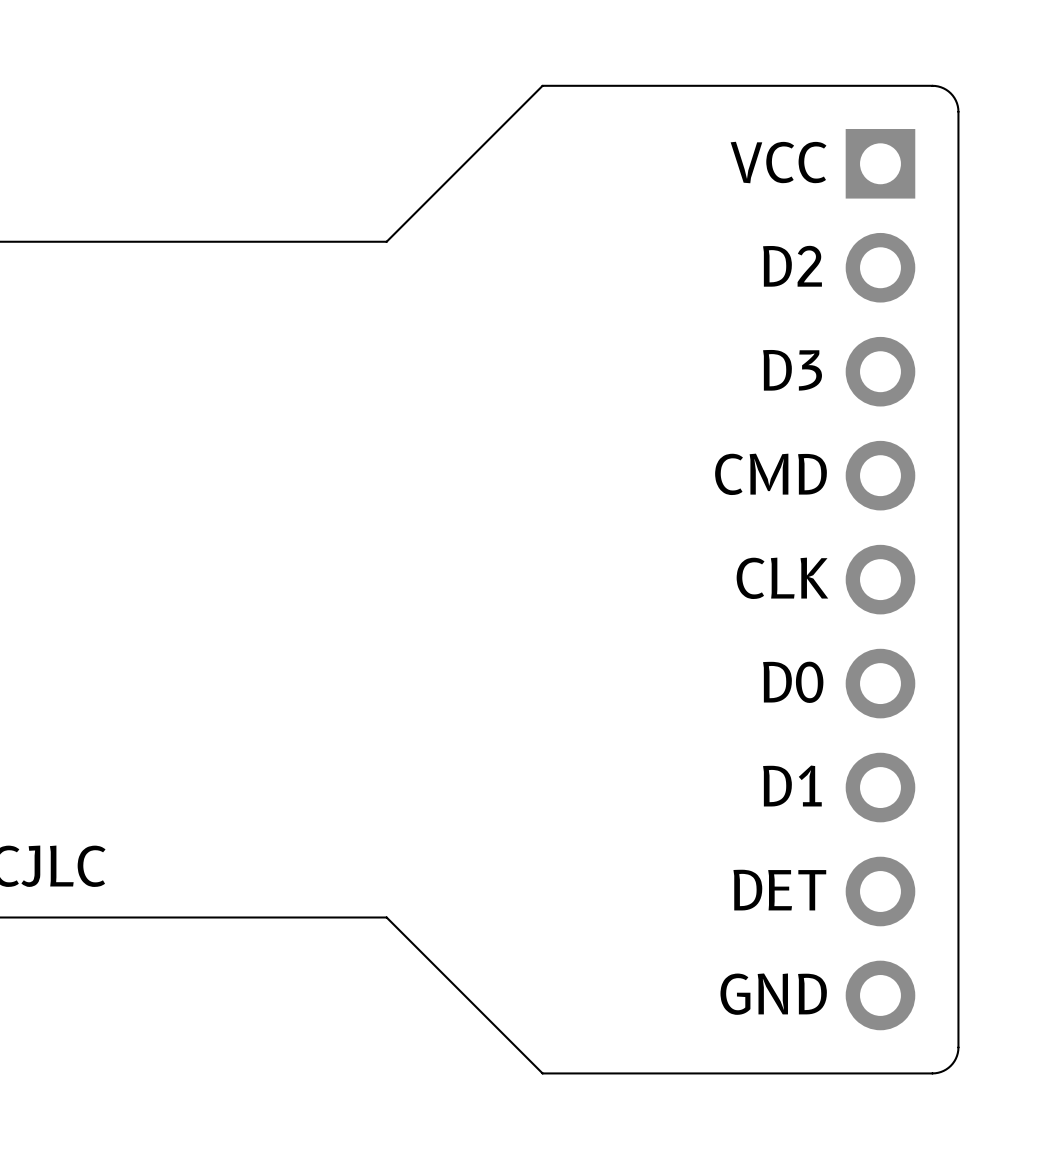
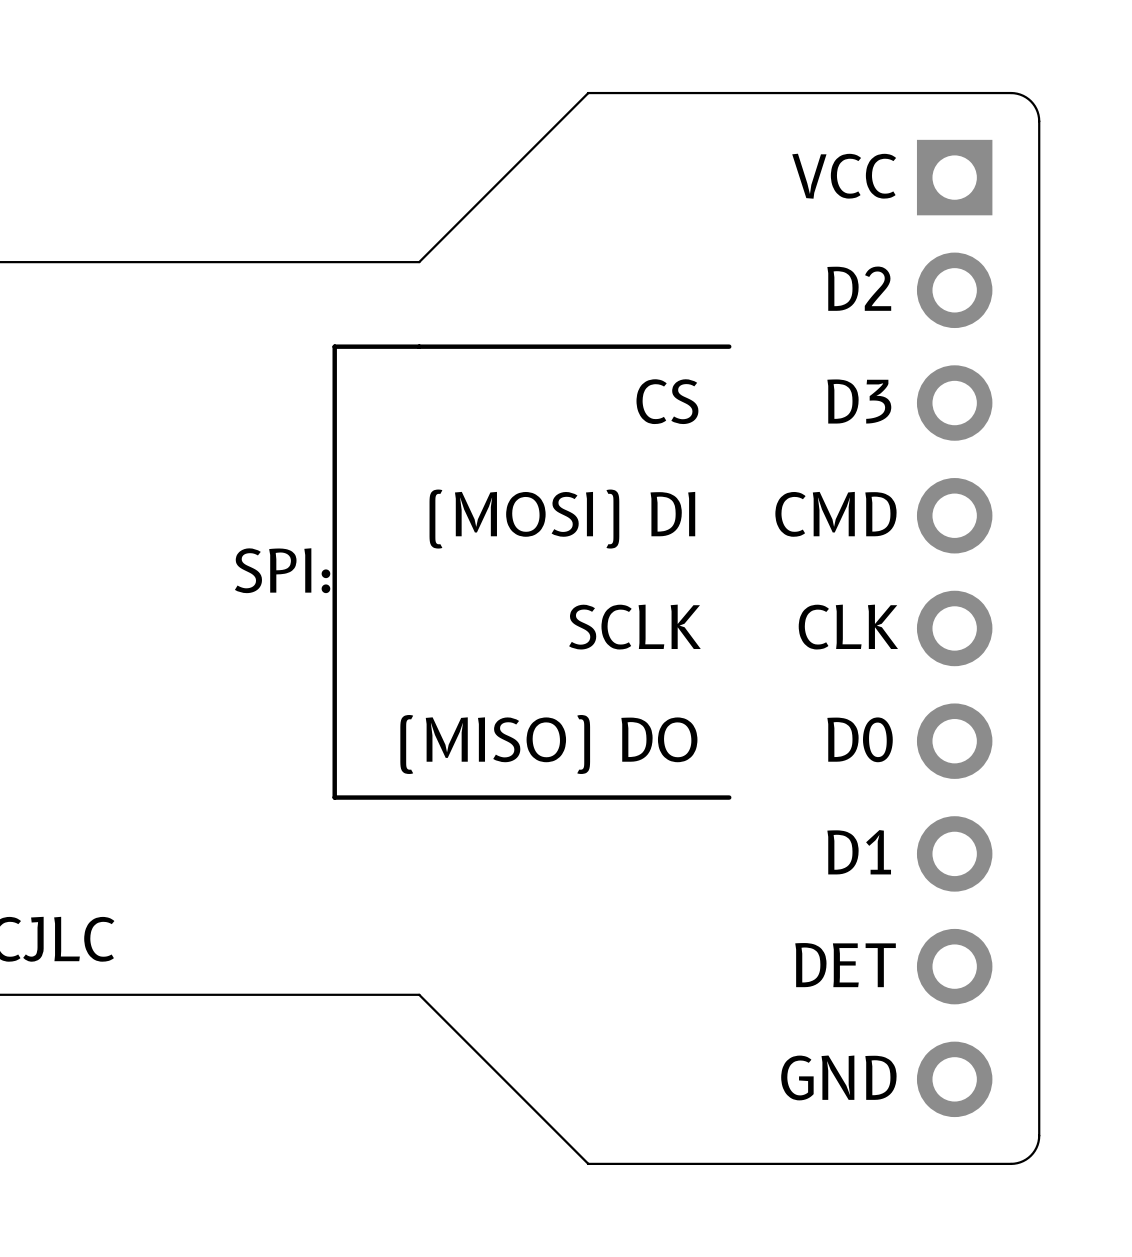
line: none -> (729, 346) (334, 346) (334, 797) (729, 797)
text: none -> CS (667, 401)
text: none -> (MOSI) DI (562, 519)
text: none -> SPI: (282, 570)
text: none -> SCLK (634, 627)
text: none -> (MISO) DO (548, 744)

